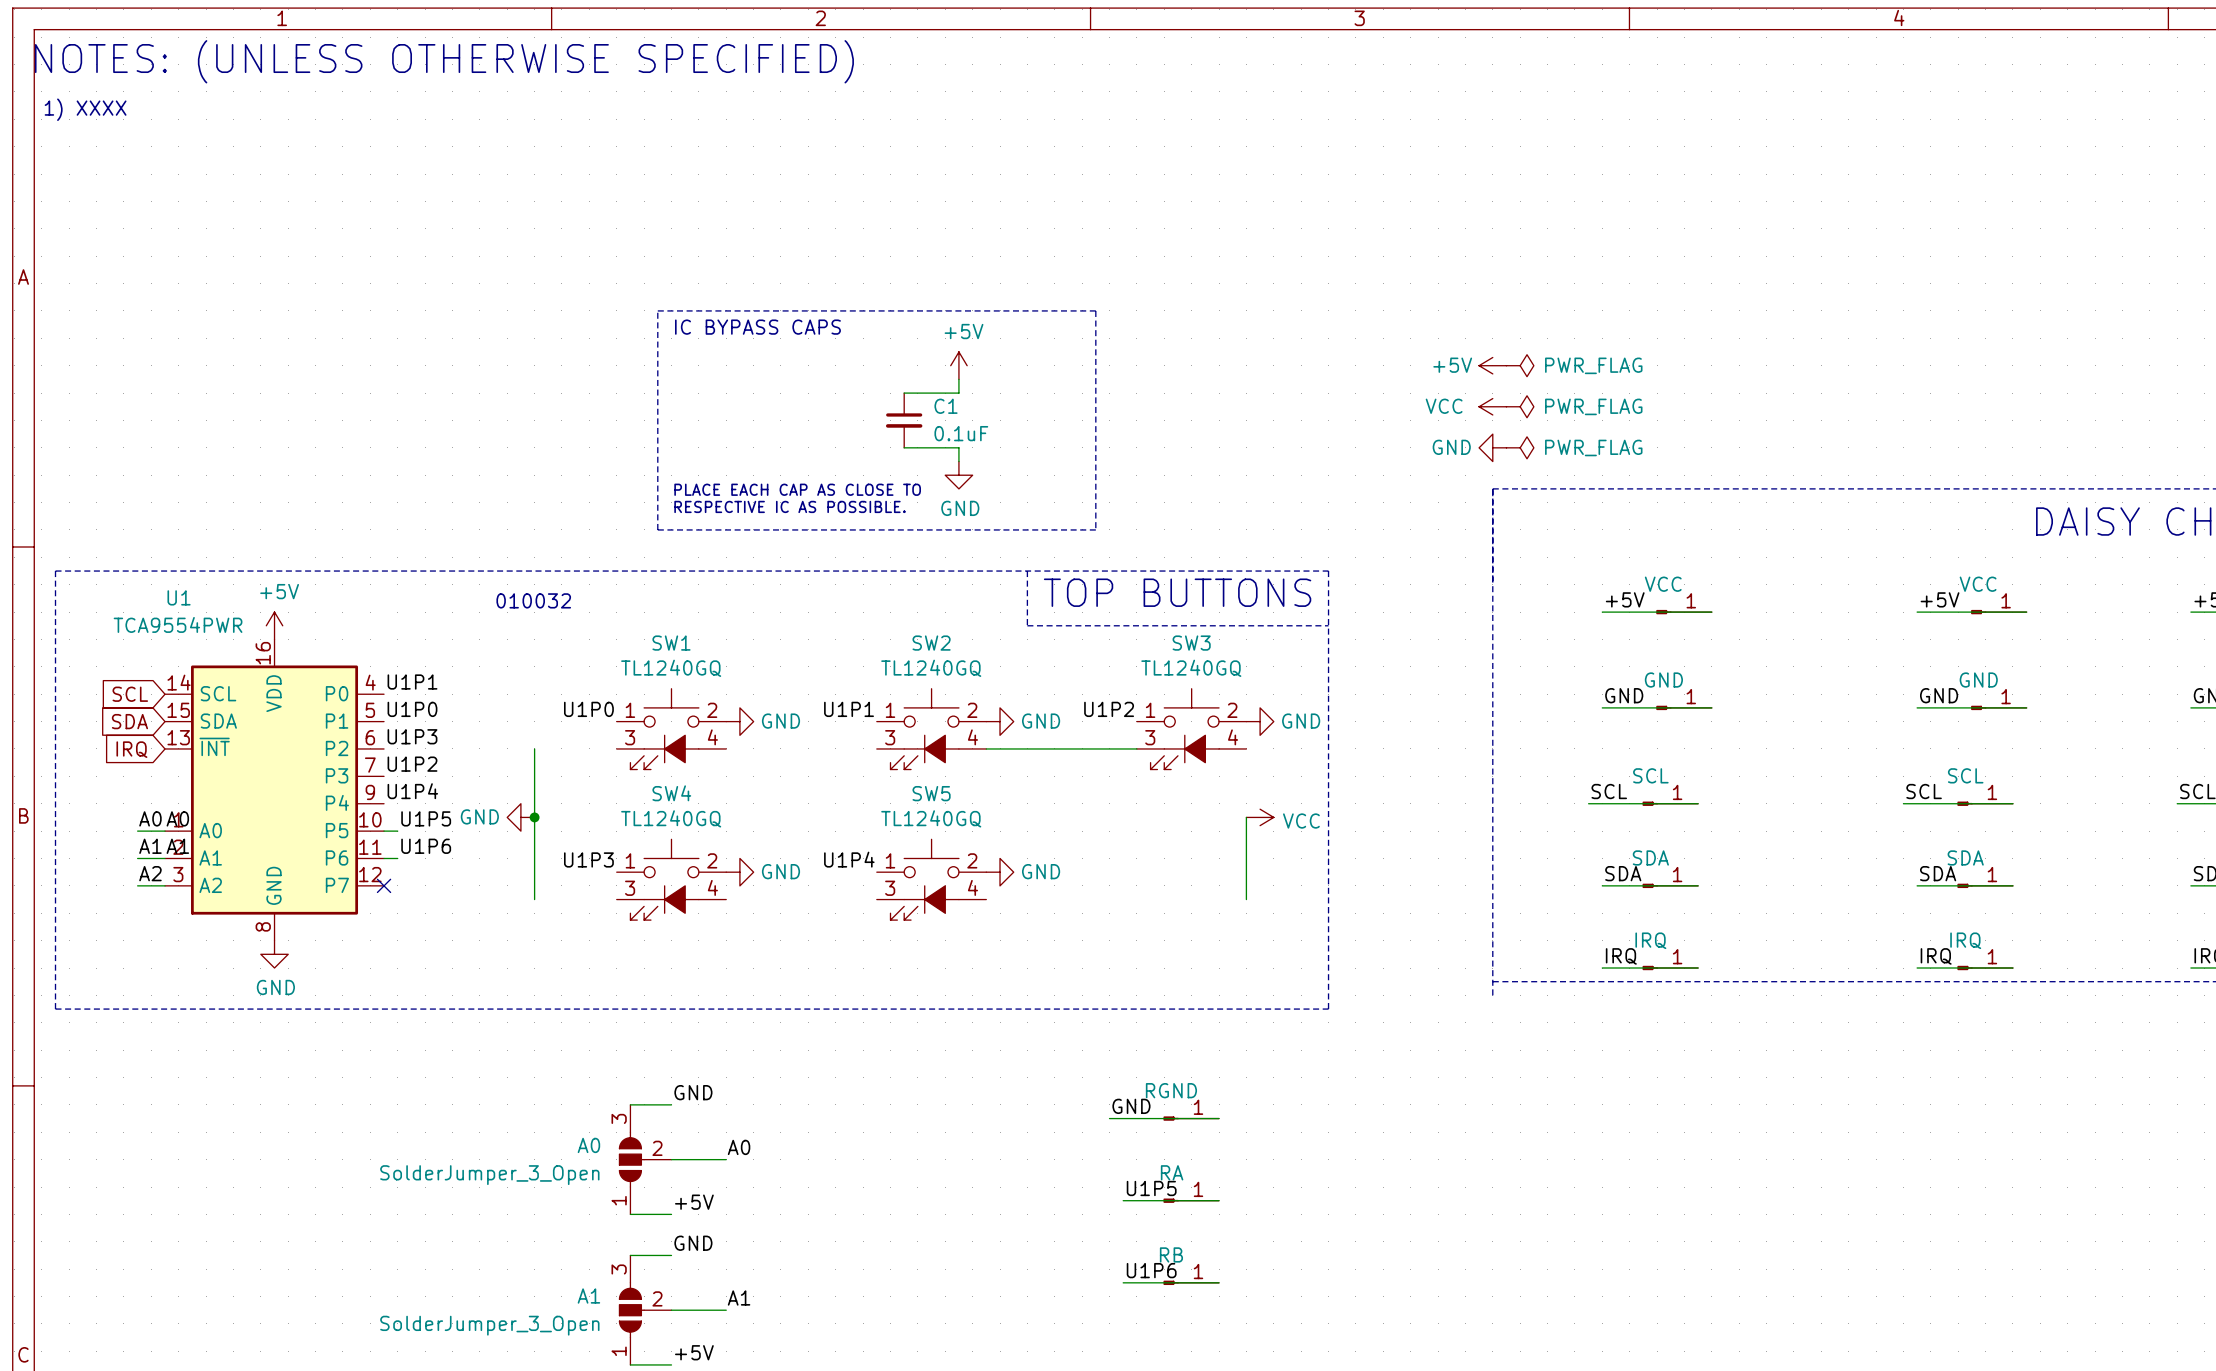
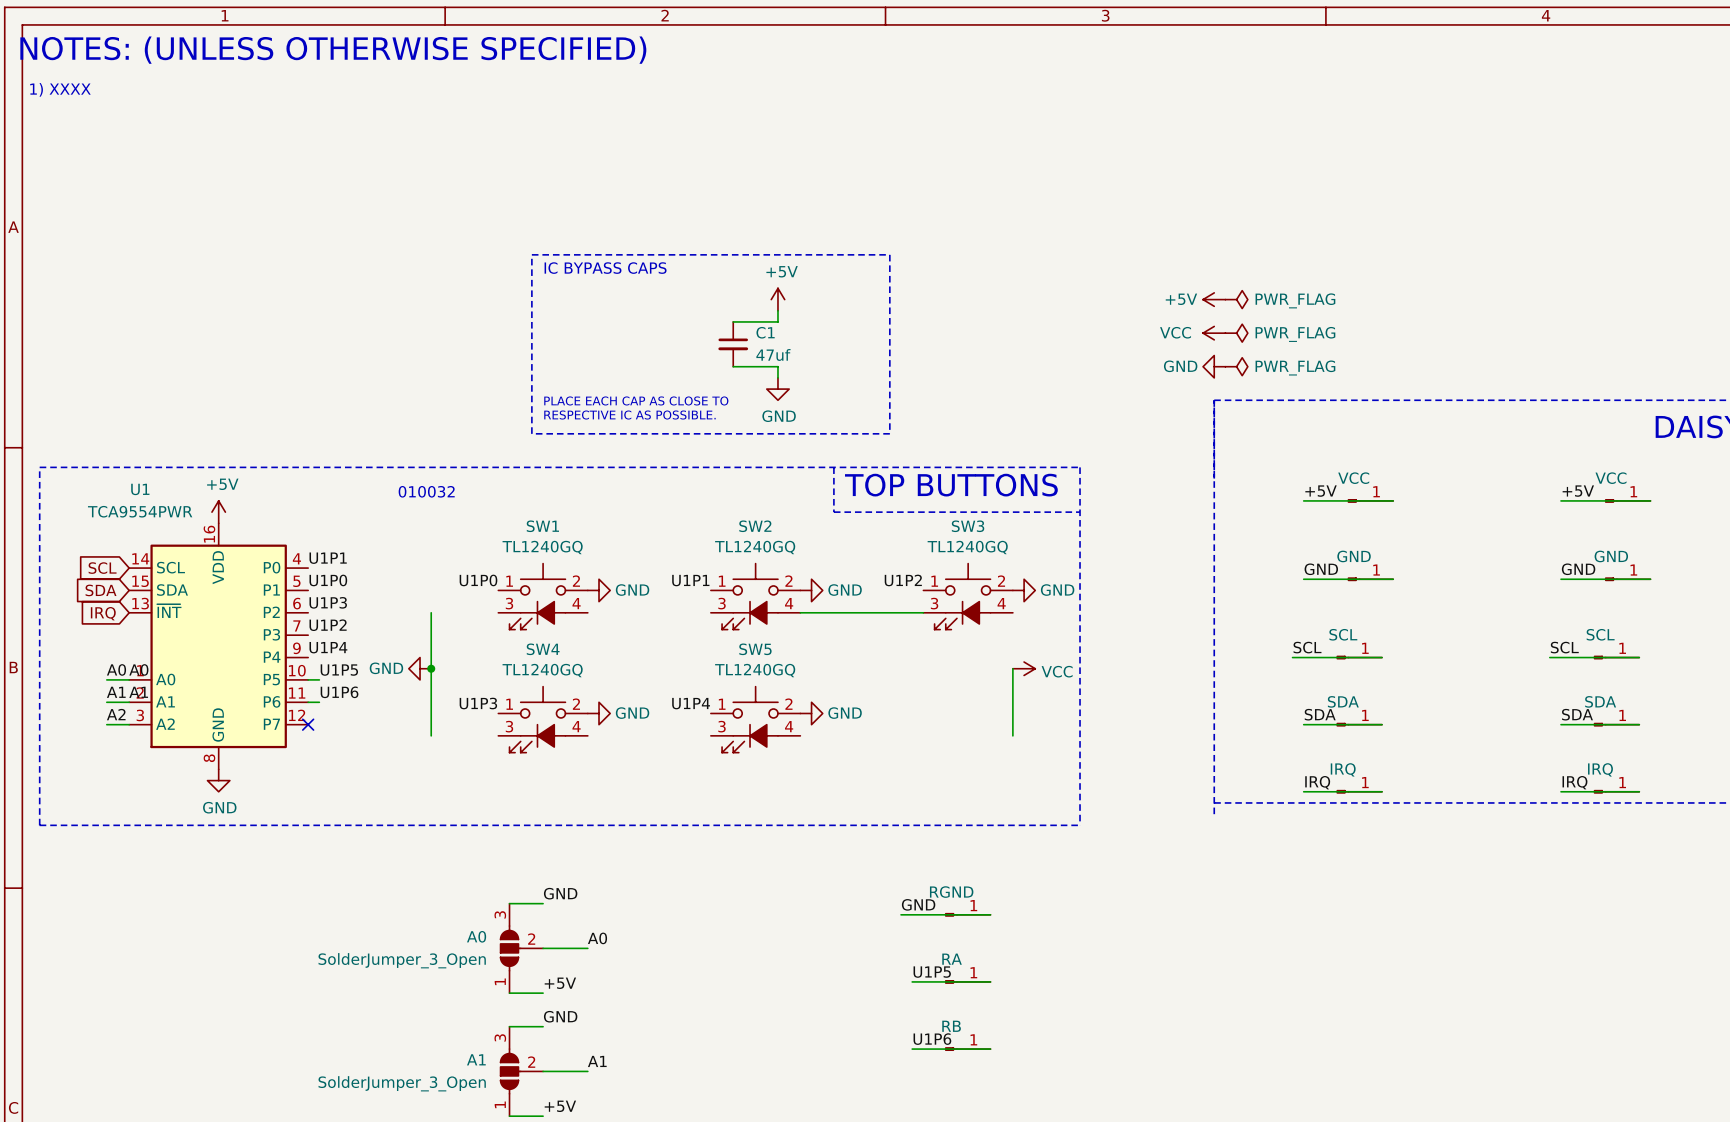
C1 value: 0.1uF (961, 433) -> 47uf (773, 354)

